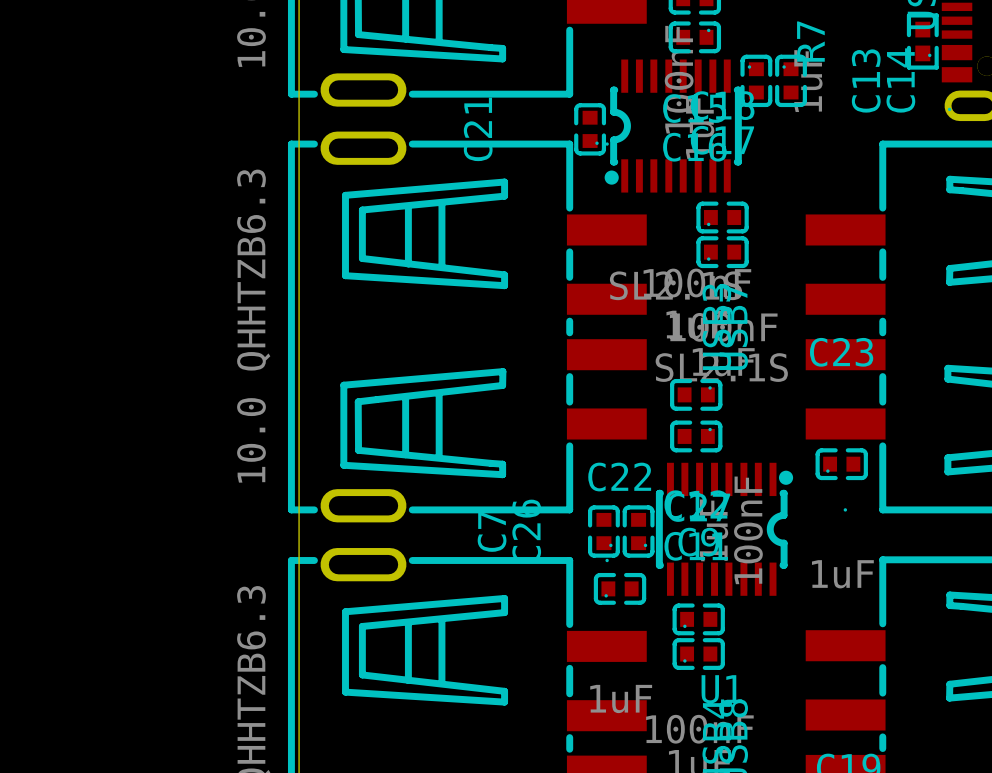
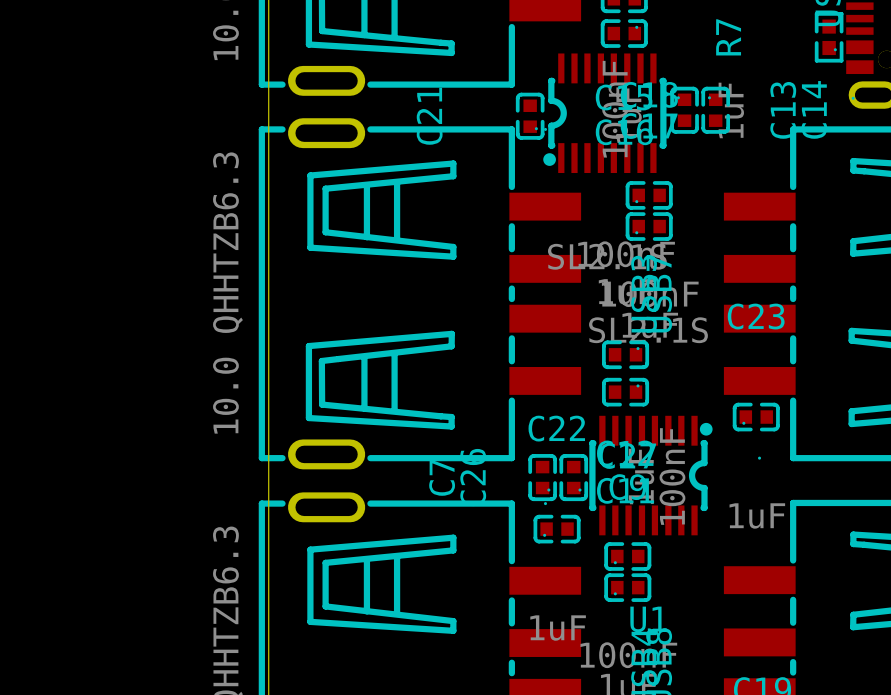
C13 position: (756, 80) -> (684, 110)
C14 position: (791, 80) -> (715, 110)

